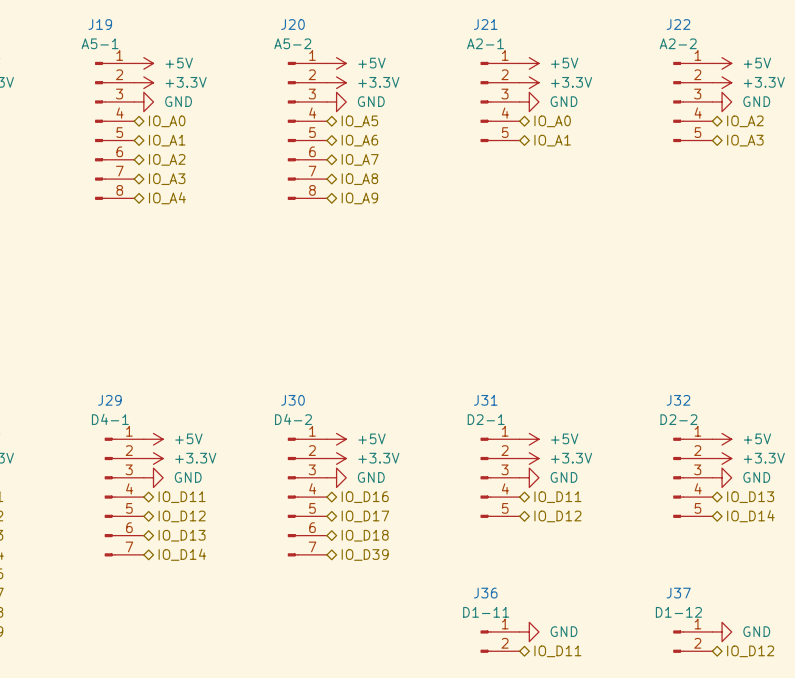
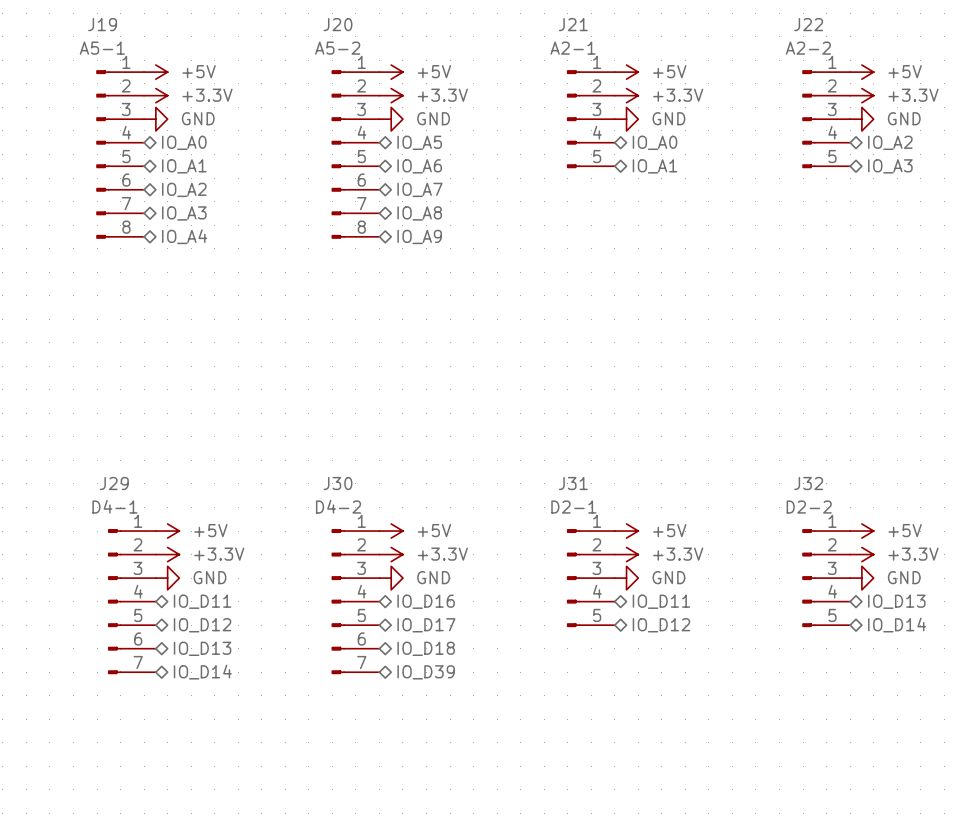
power symbol: GND (529, 631) -> none
power symbol: GND (722, 631) -> none
J36: D1-11 (500, 641) -> none
J37: D1-12 (692, 641) -> none
hierarchical label: IO_D11 (557, 651) -> none
hierarchical label: IO_D12 (750, 651) -> none

